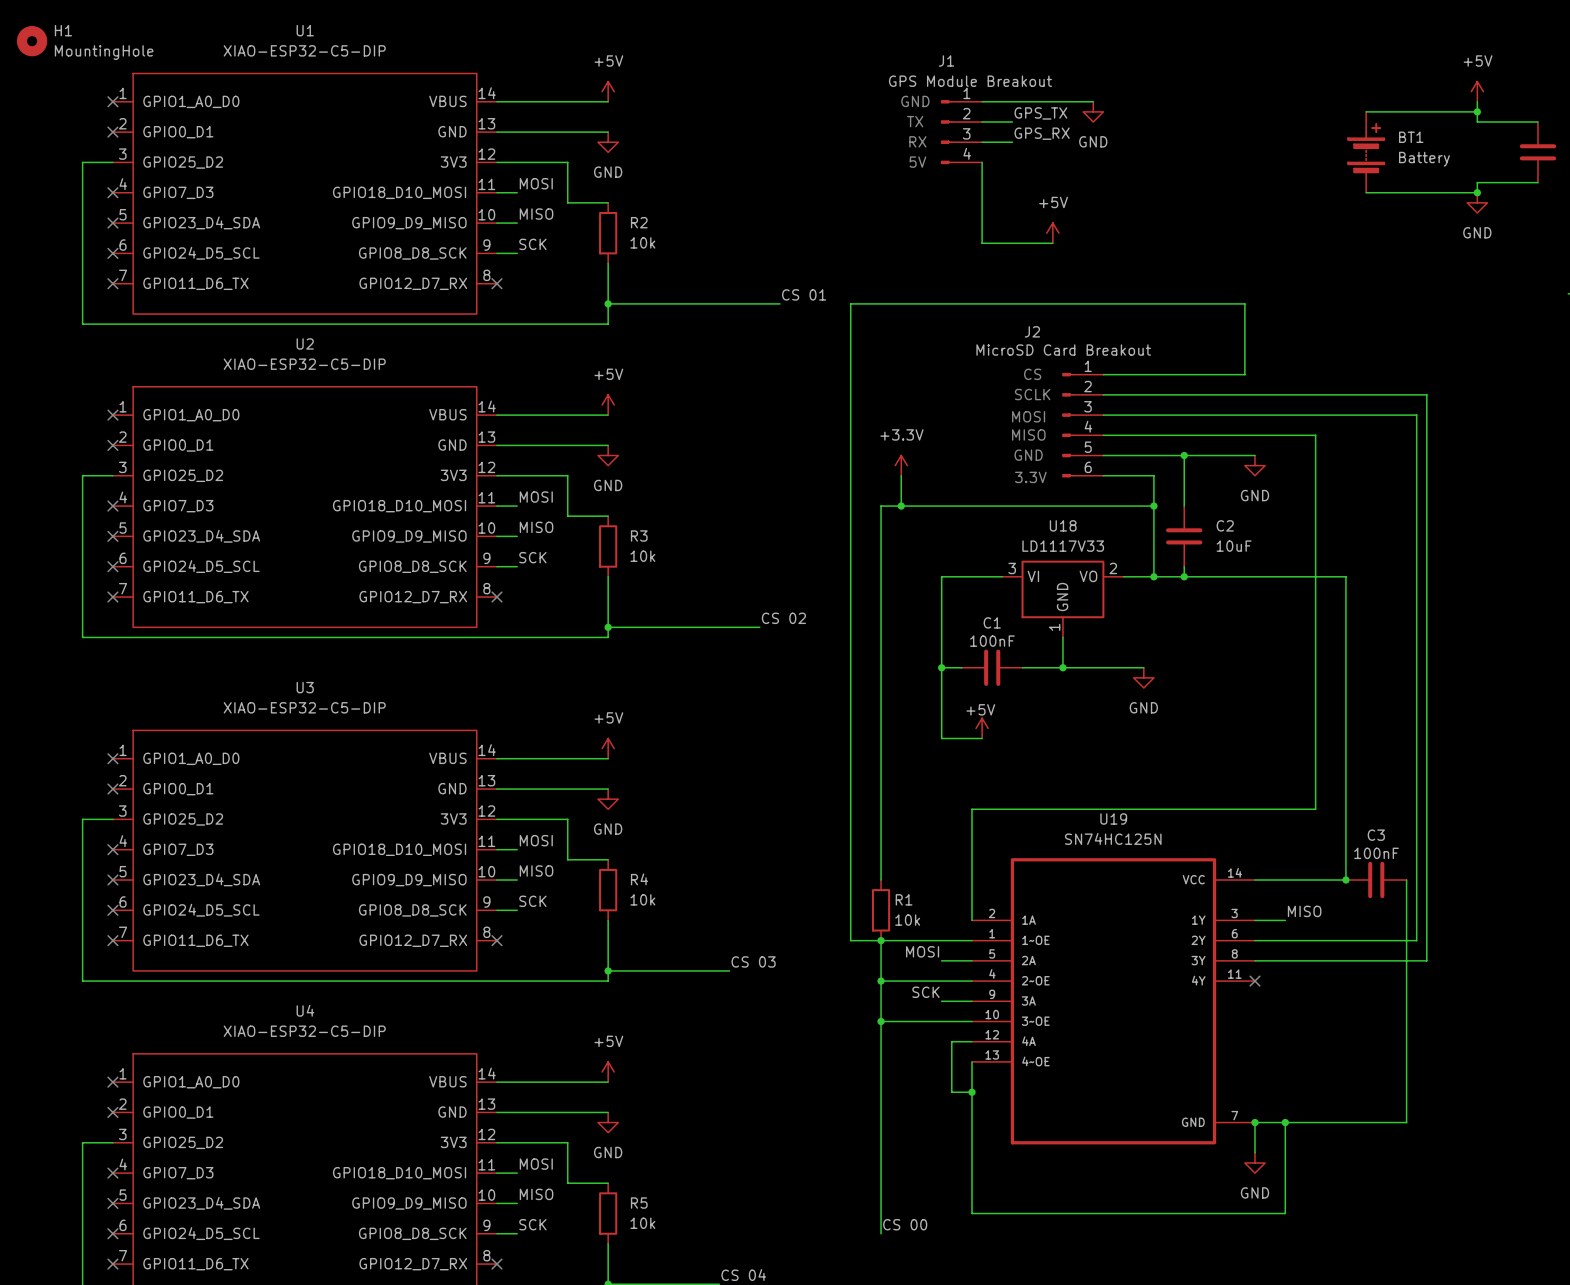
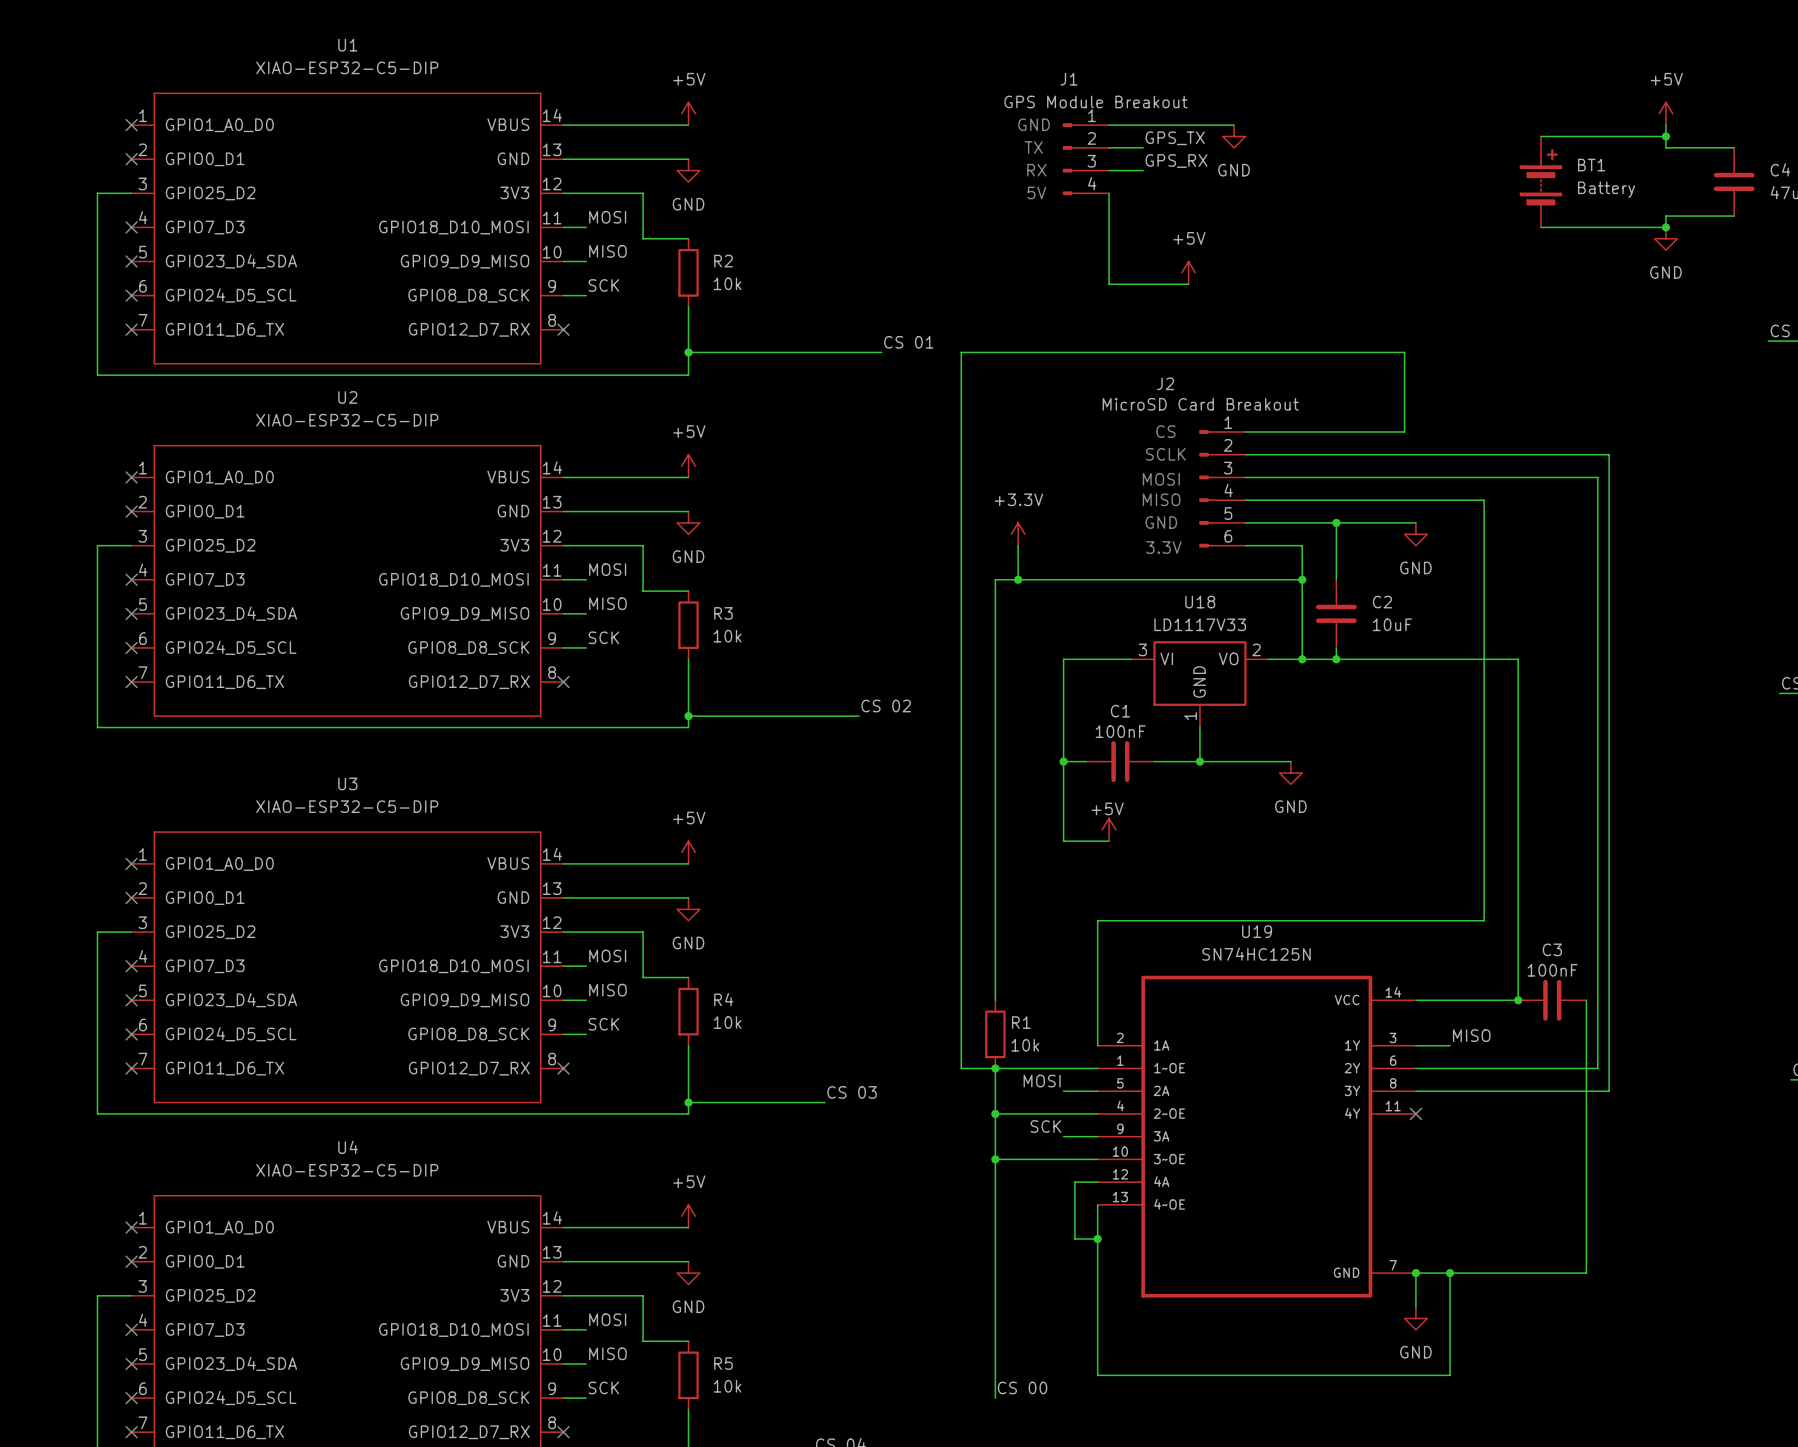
H1: MountingHole (32, 41) -> none

